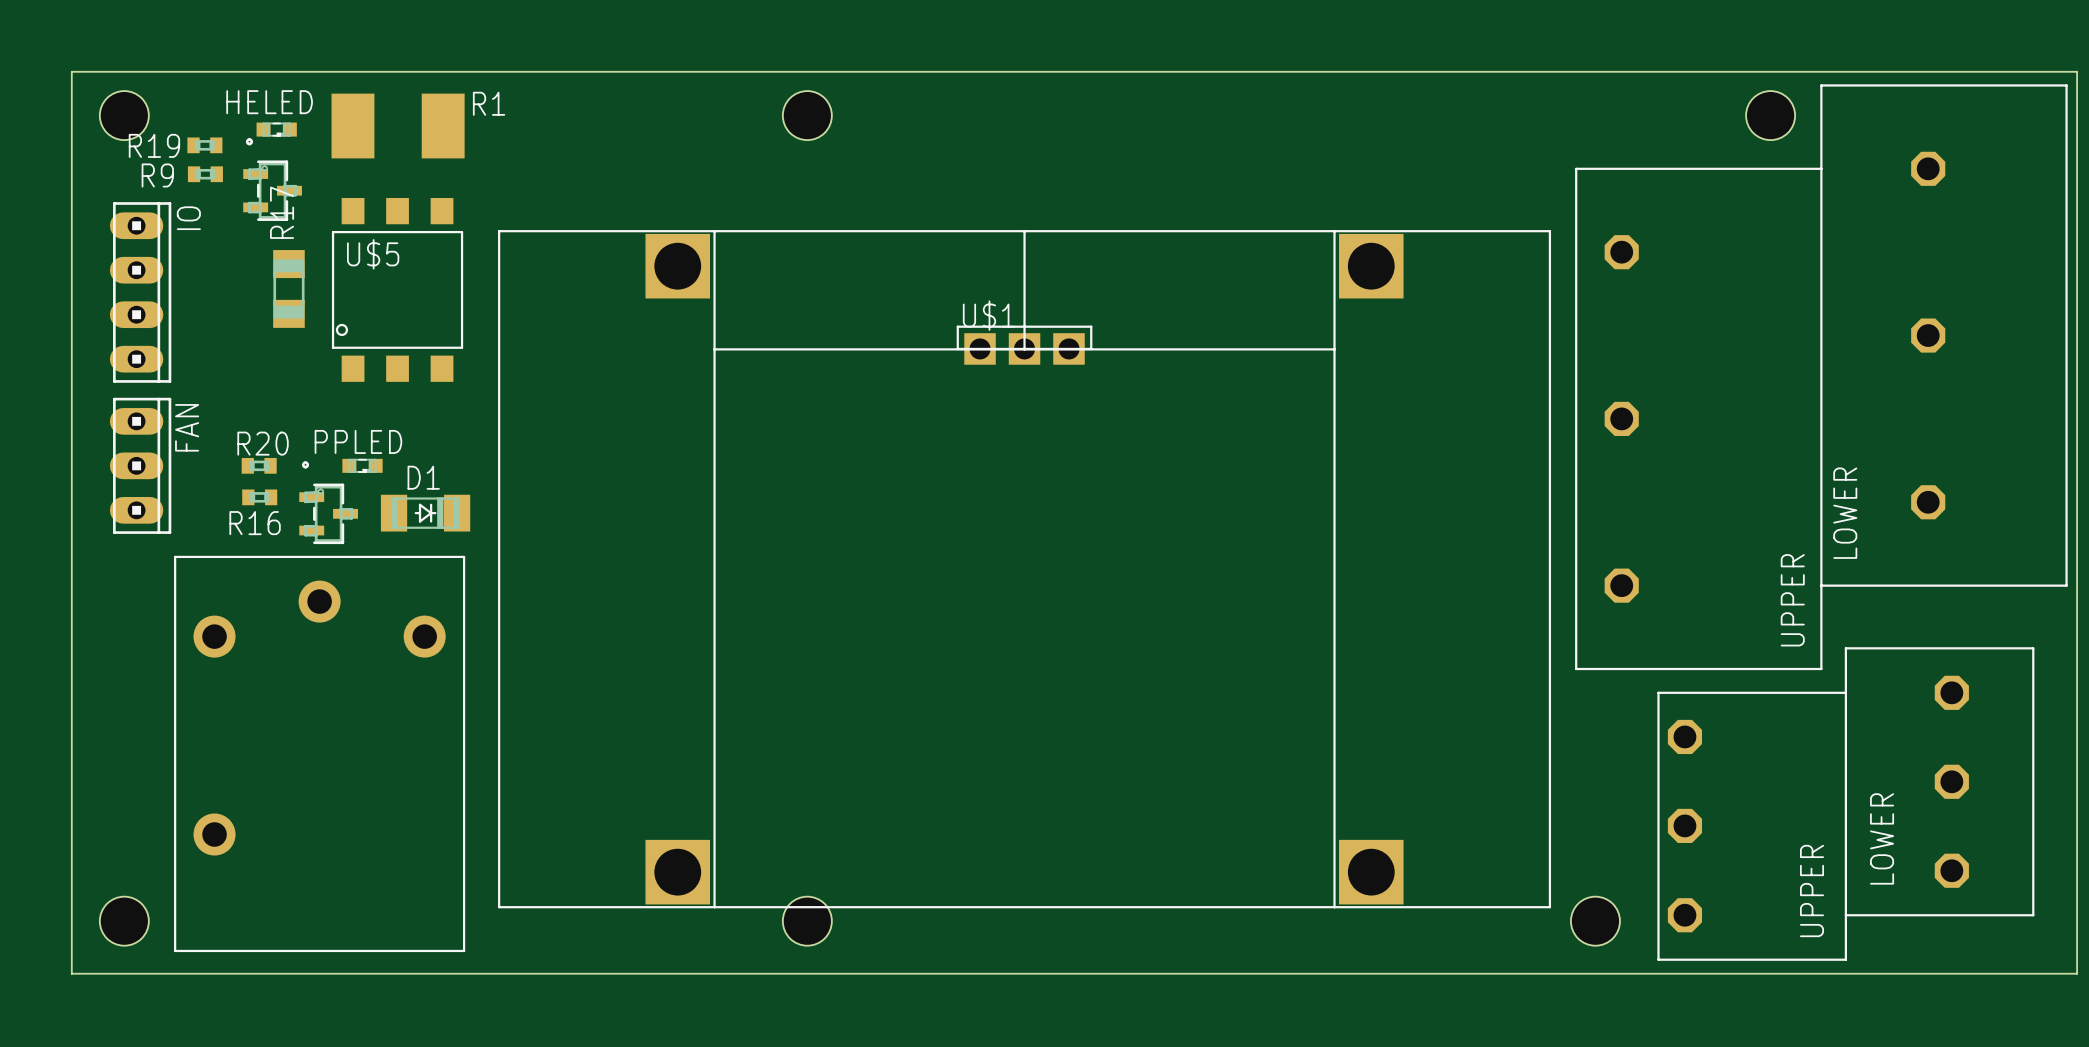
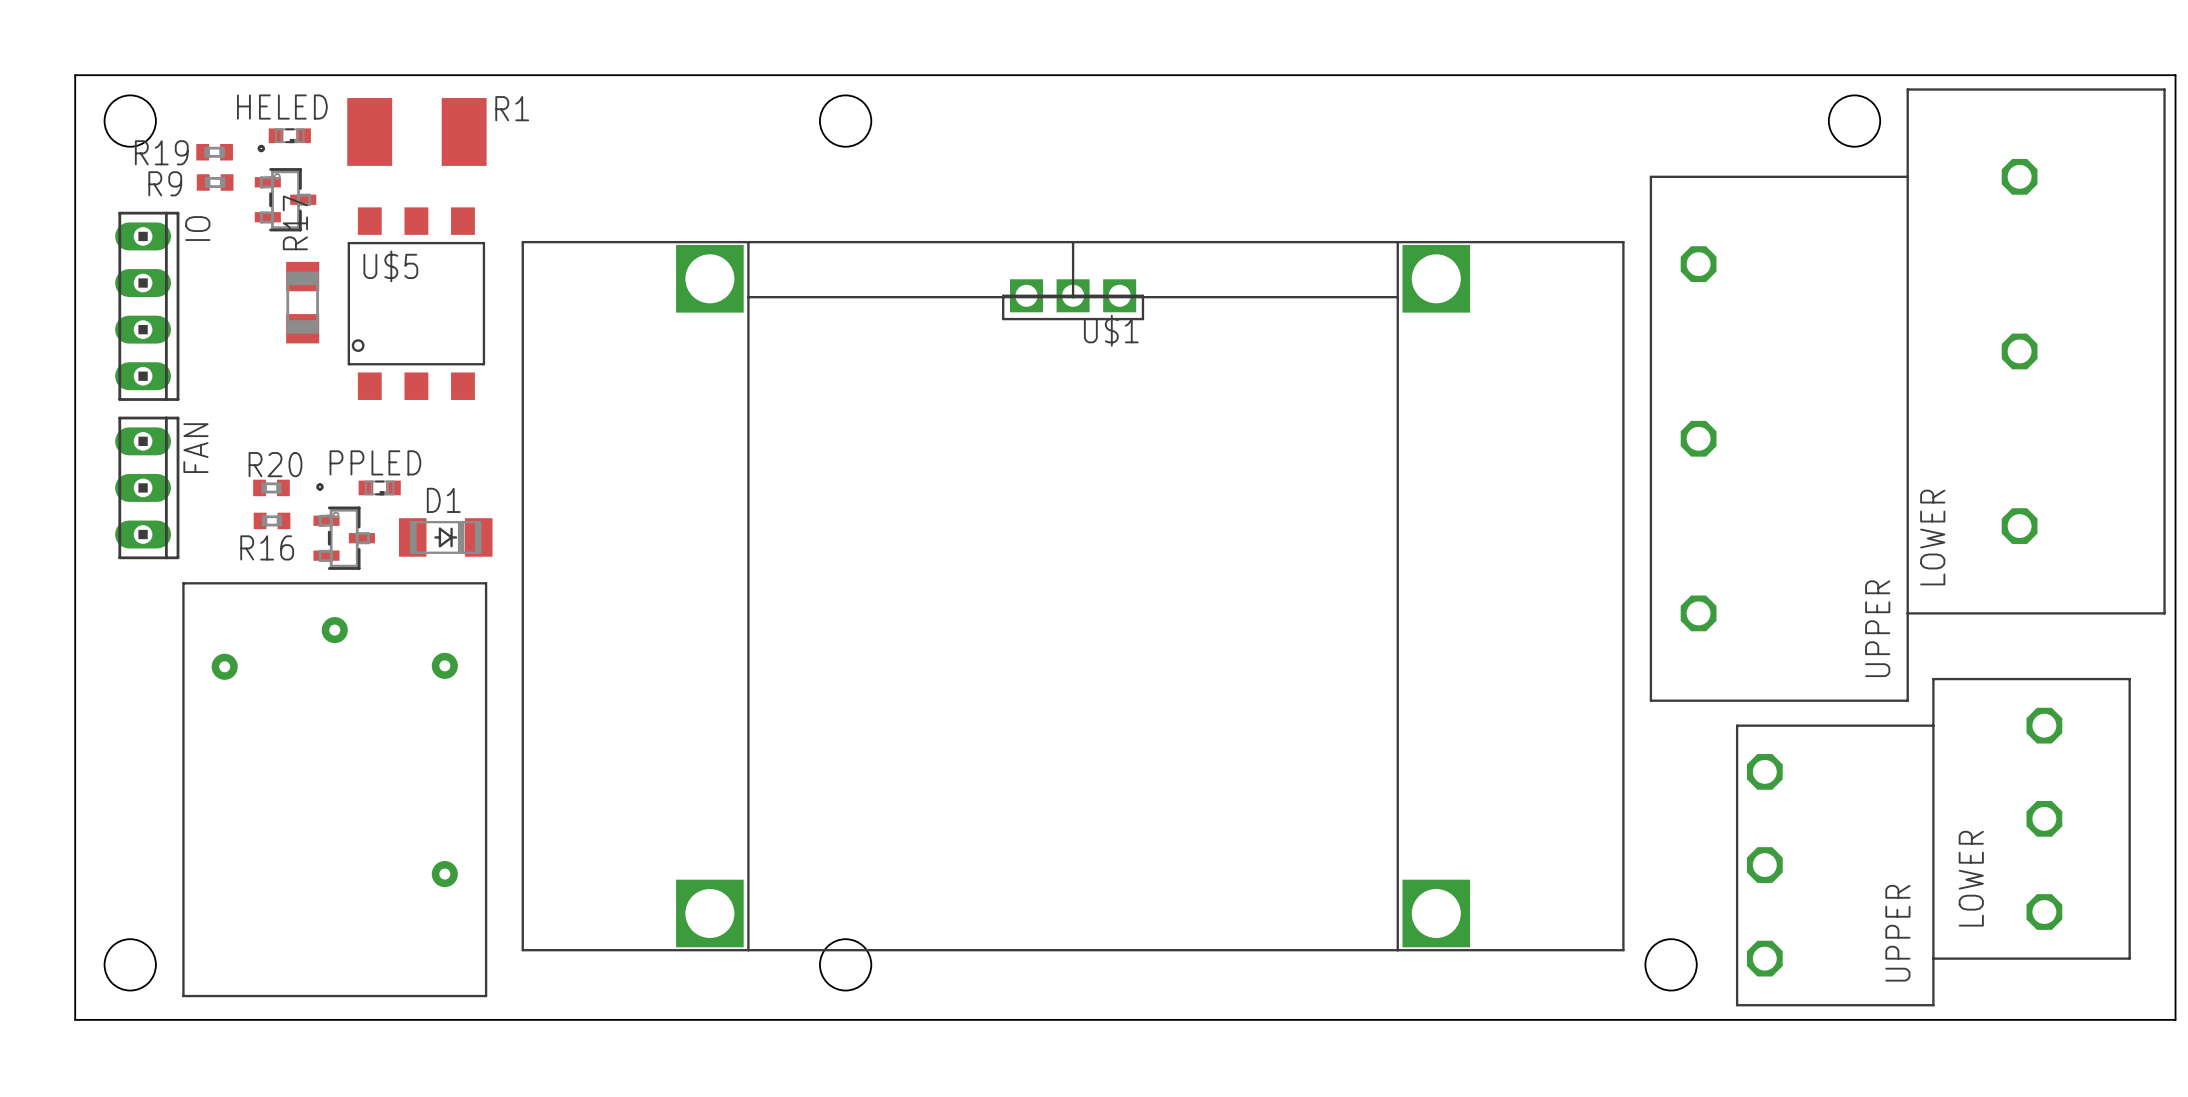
part footprint: [498, 230, 1552, 909] -> [521, 240, 1625, 952]
U$1 rotation: 0° (1024, 345) -> 180° (1073, 299)
part footprint: [174, 555, 466, 953] -> [182, 582, 488, 998]

